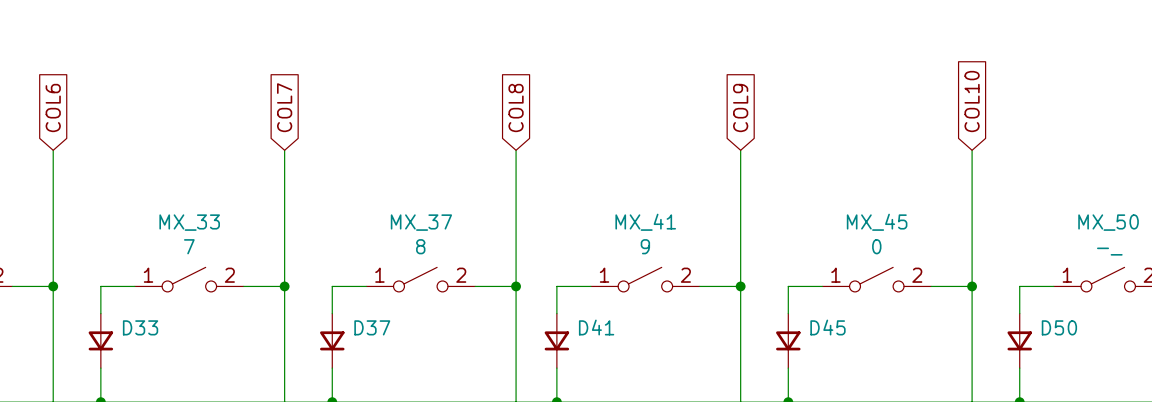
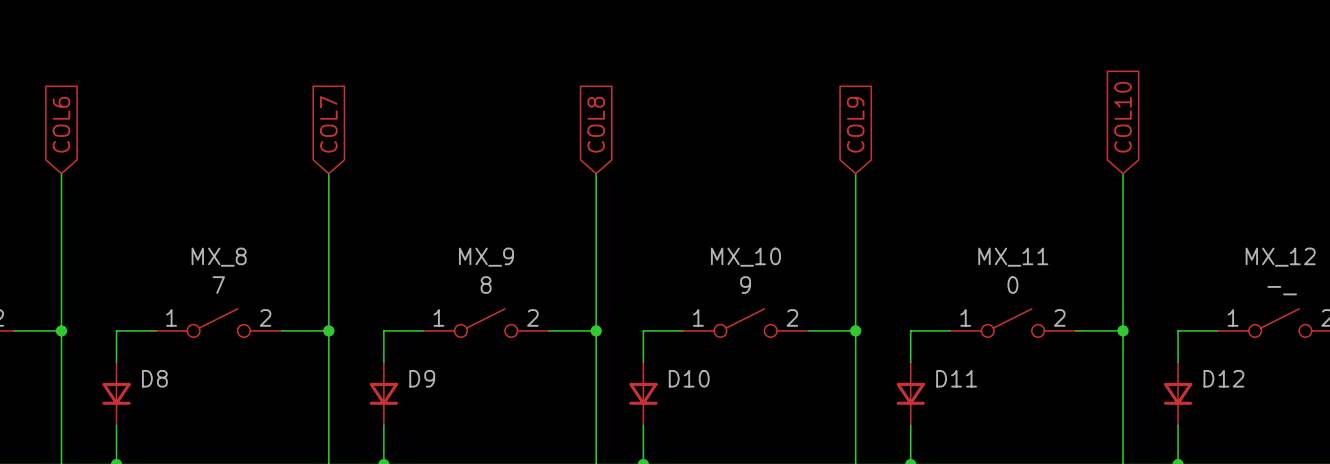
MX_33 name: MX_33 (189, 222) -> MX_8 (219, 257)
MX_37 name: MX_37 (421, 222) -> MX_9 (486, 257)
MX_41 name: MX_41 (645, 222) -> MX_10 (745, 257)
MX_45 name: MX_45 (877, 222) -> MX_11 (1013, 257)
MX_50 name: MX_50 (1108, 222) -> MX_12 (1280, 257)
D33 name: D33 (140, 327) -> D8 (154, 378)
D37 name: D37 (372, 327) -> D9 (422, 378)
D41 name: D41 (596, 327) -> D10 (689, 378)
D45 name: D45 (827, 327) -> D11 (956, 378)
D50 name: D50 (1059, 327) -> D12 (1223, 378)

